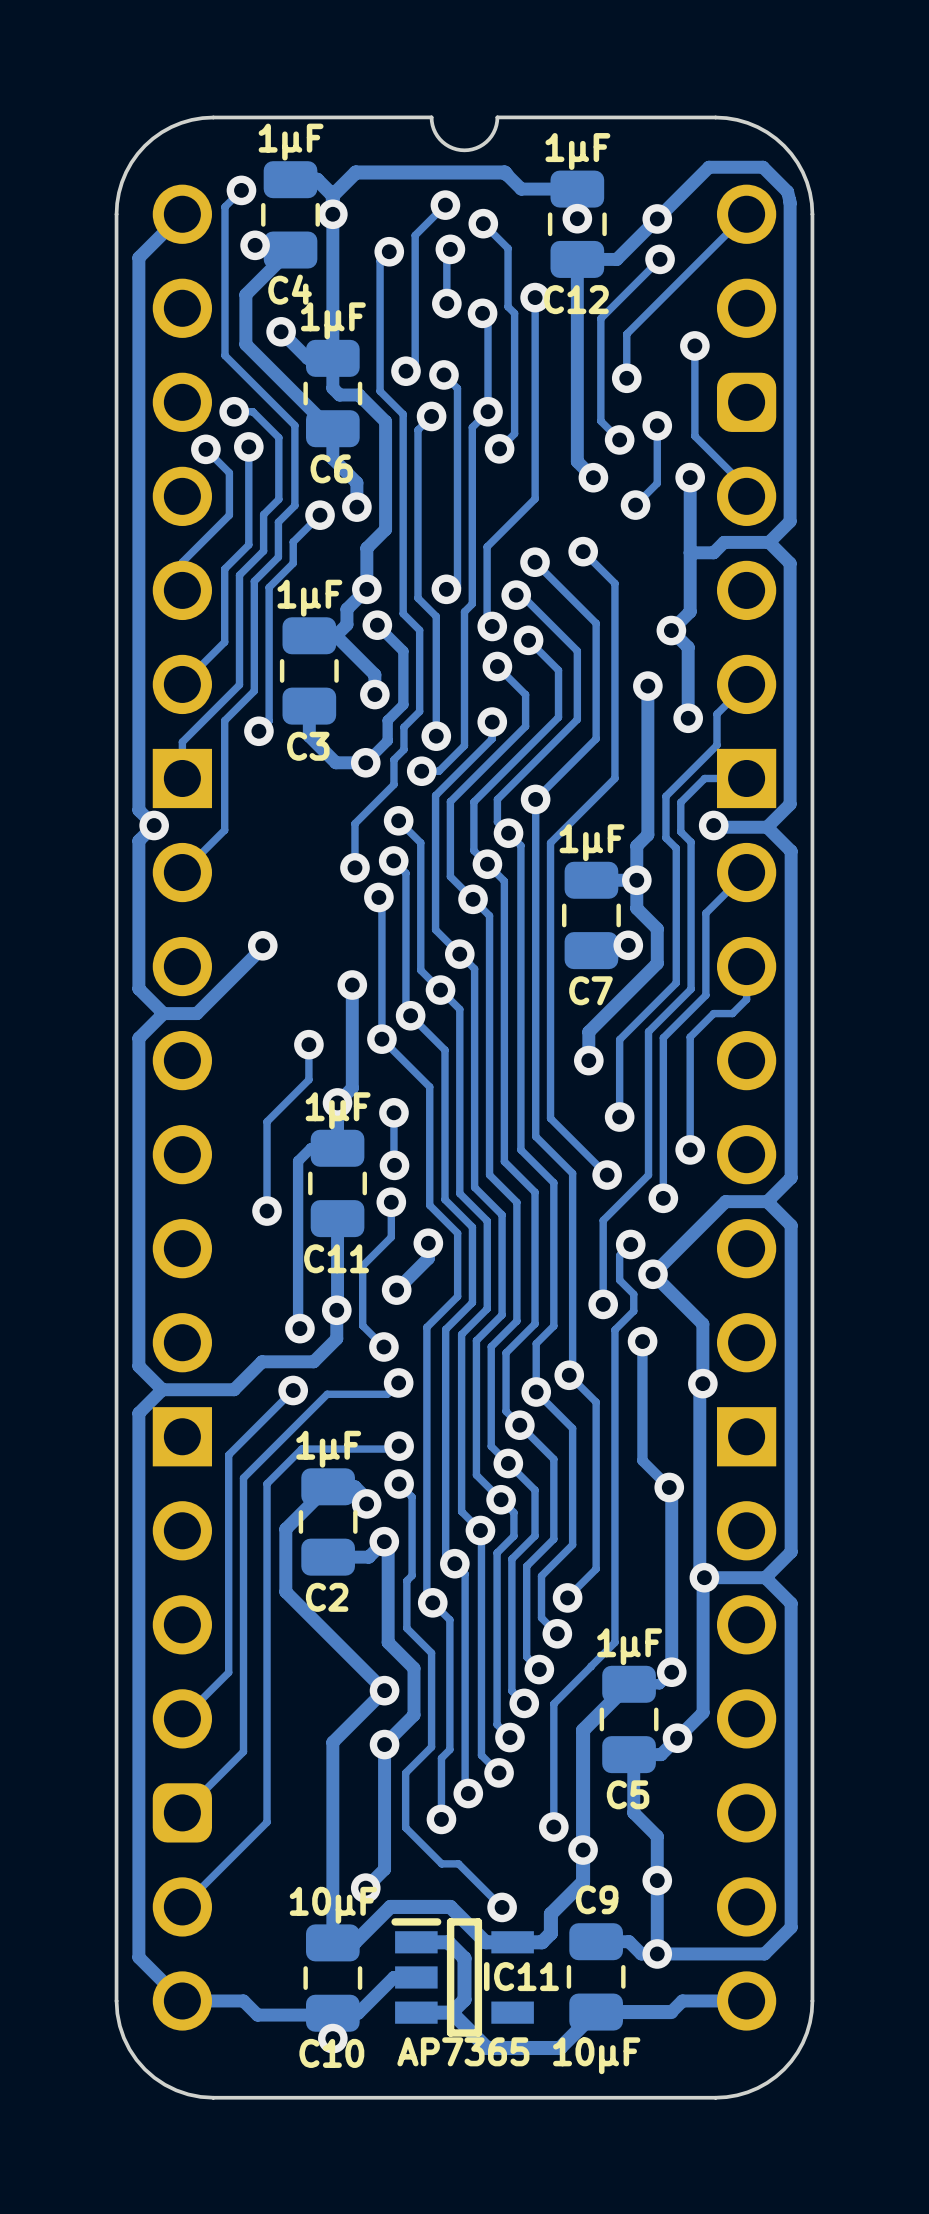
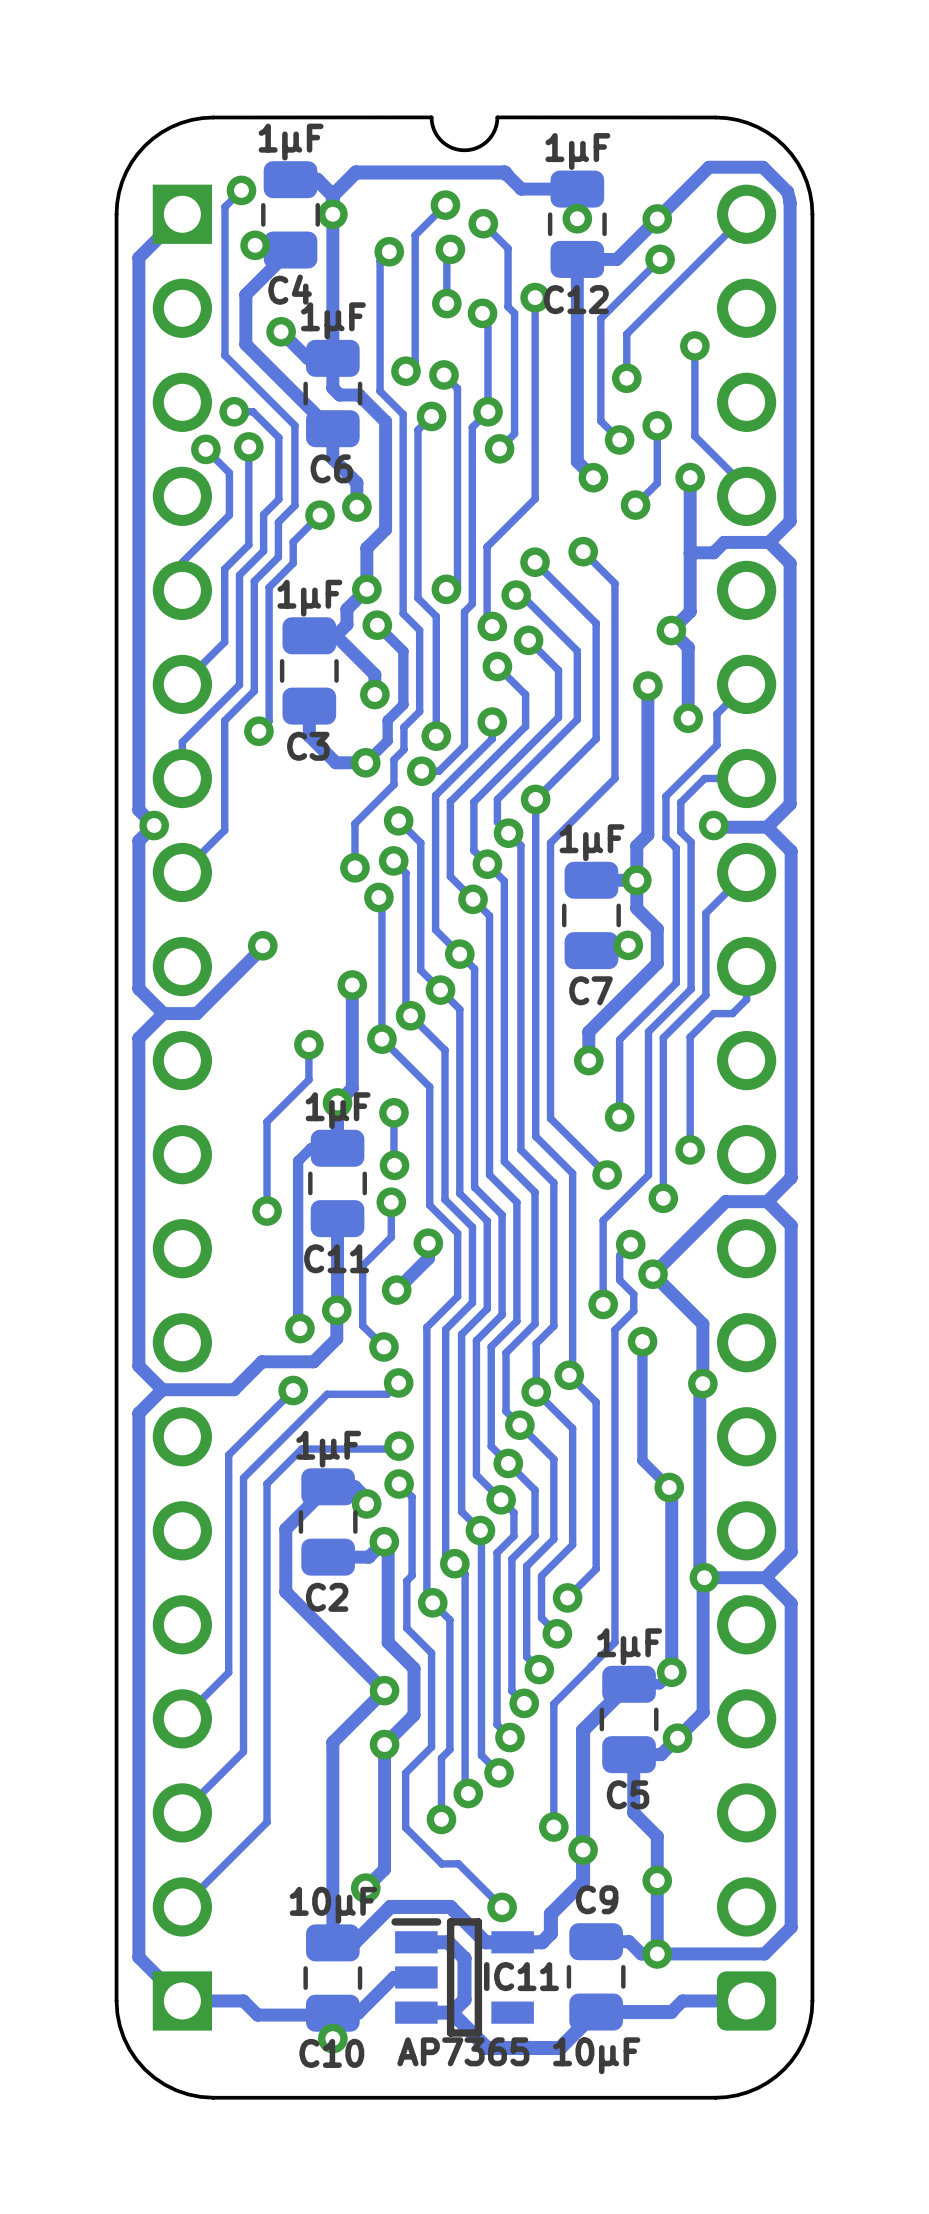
part footprint: [114, 115, 815, 2100] -> [114, 115, 815, 2100]

